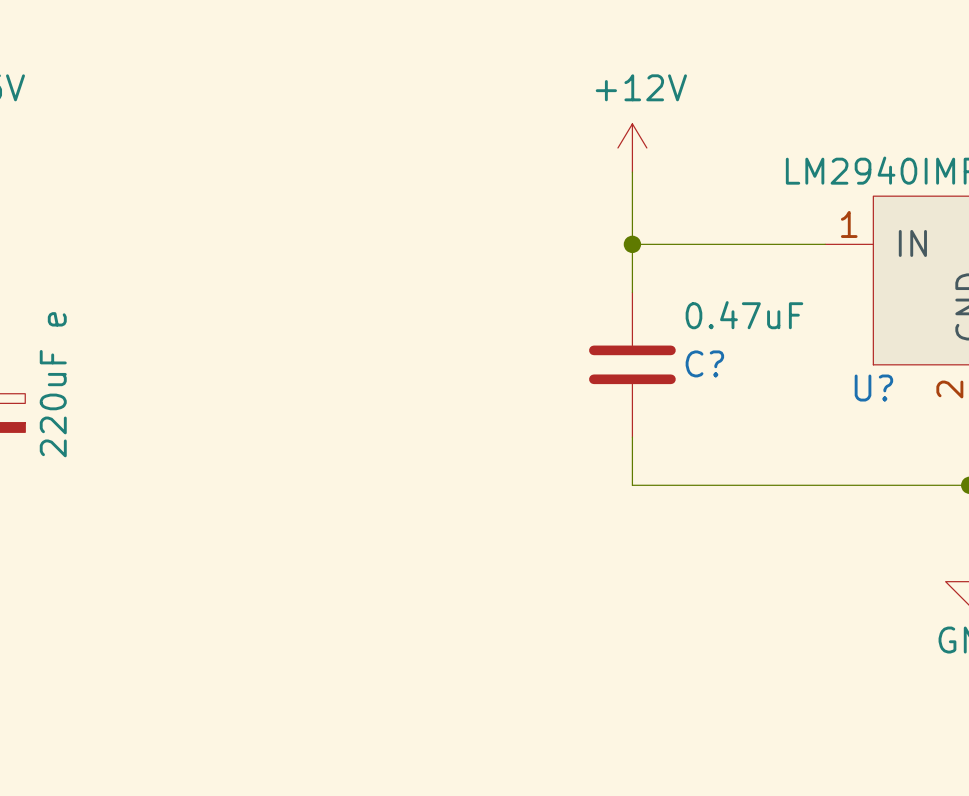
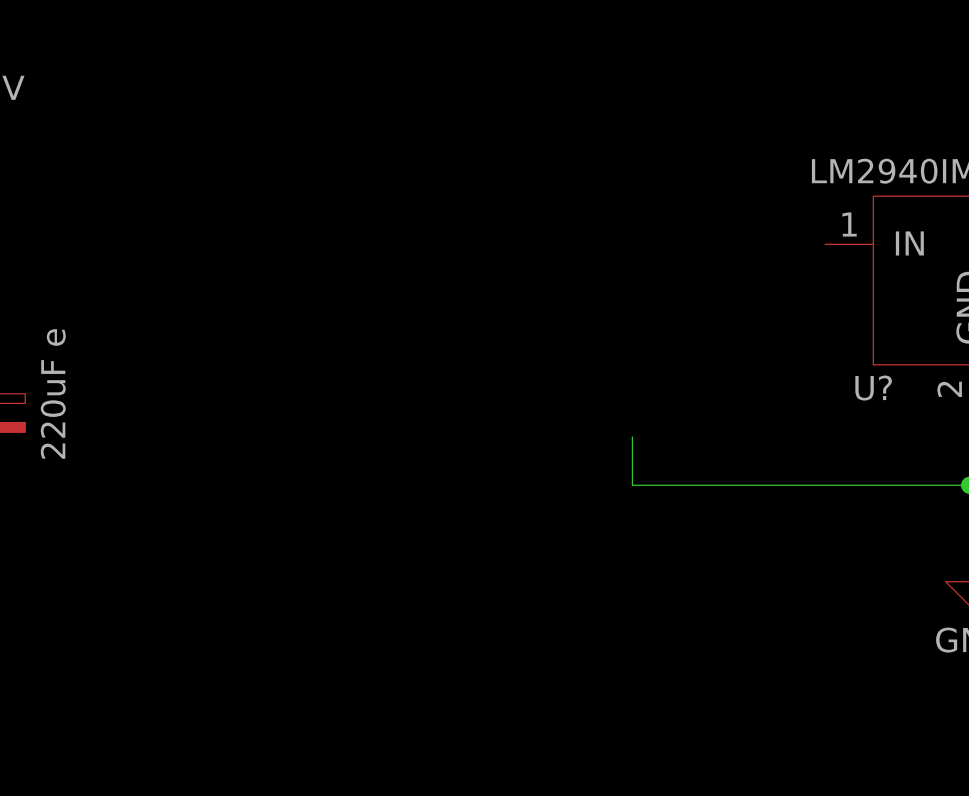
power symbol: +12V (632, 147) -> none
wire: (632, 172) (632, 292) -> none
wire: (632, 244) (825, 244) -> none
junction: (632, 244) -> none
C?: 0.47uF (632, 364) -> none

